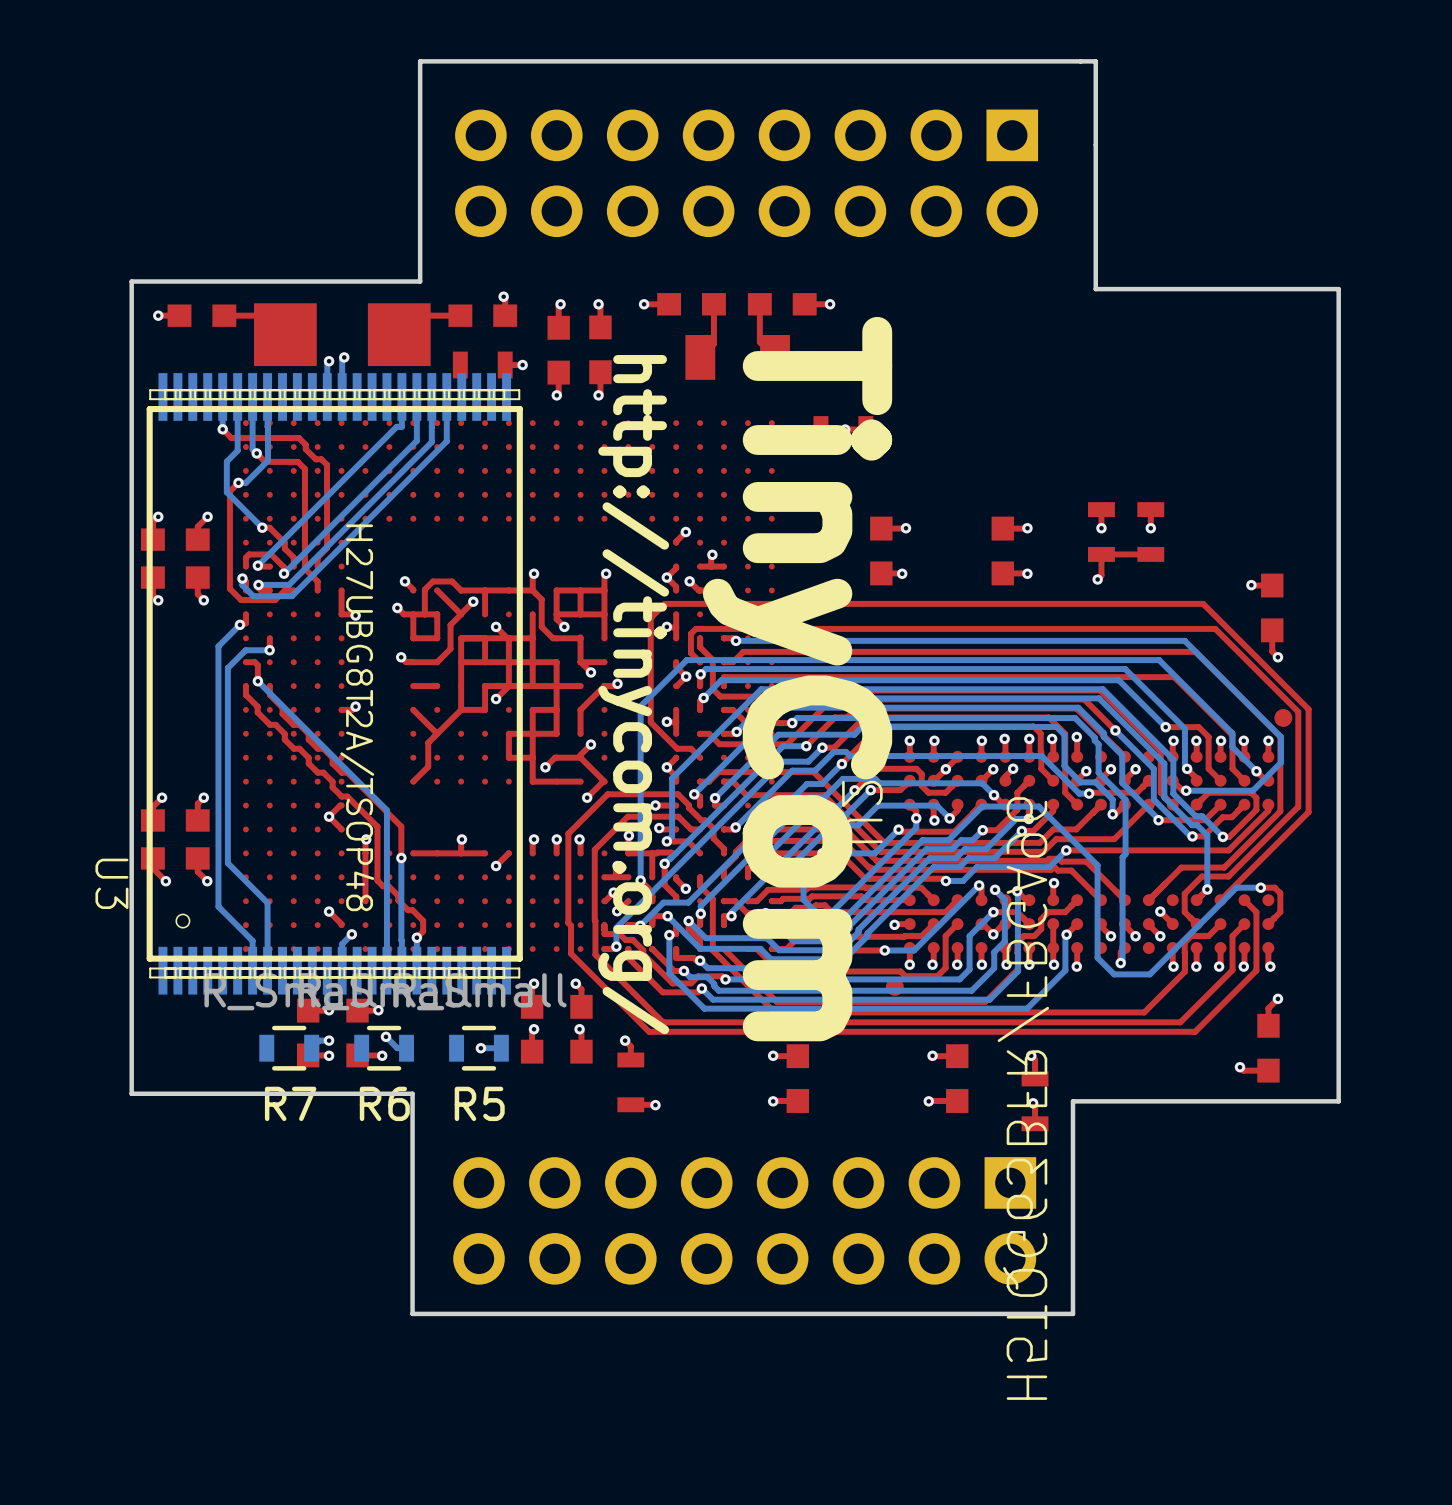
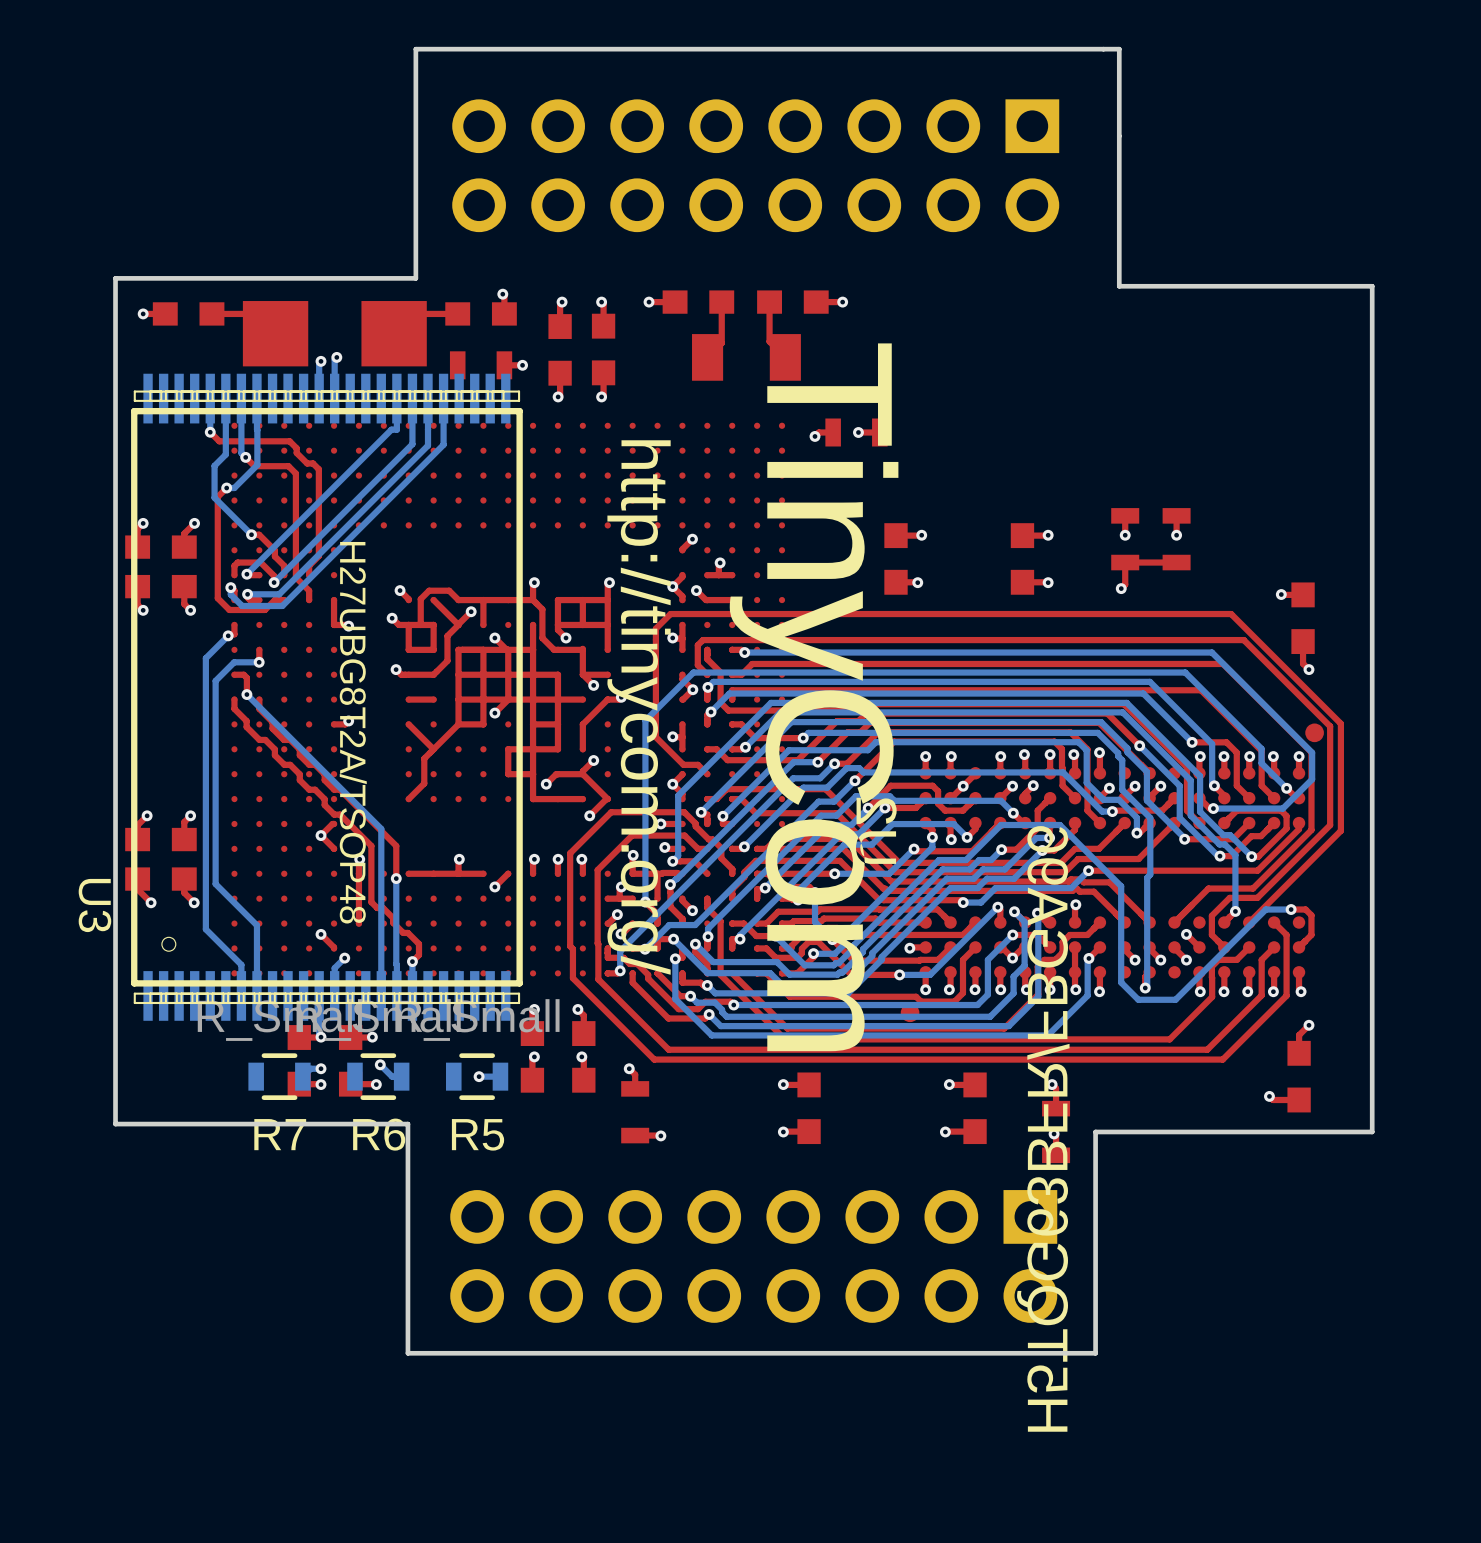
top track: none -> (483, 674) (483, 699) (458, 699)
top track: none -> (533, 699) (533, 724)

